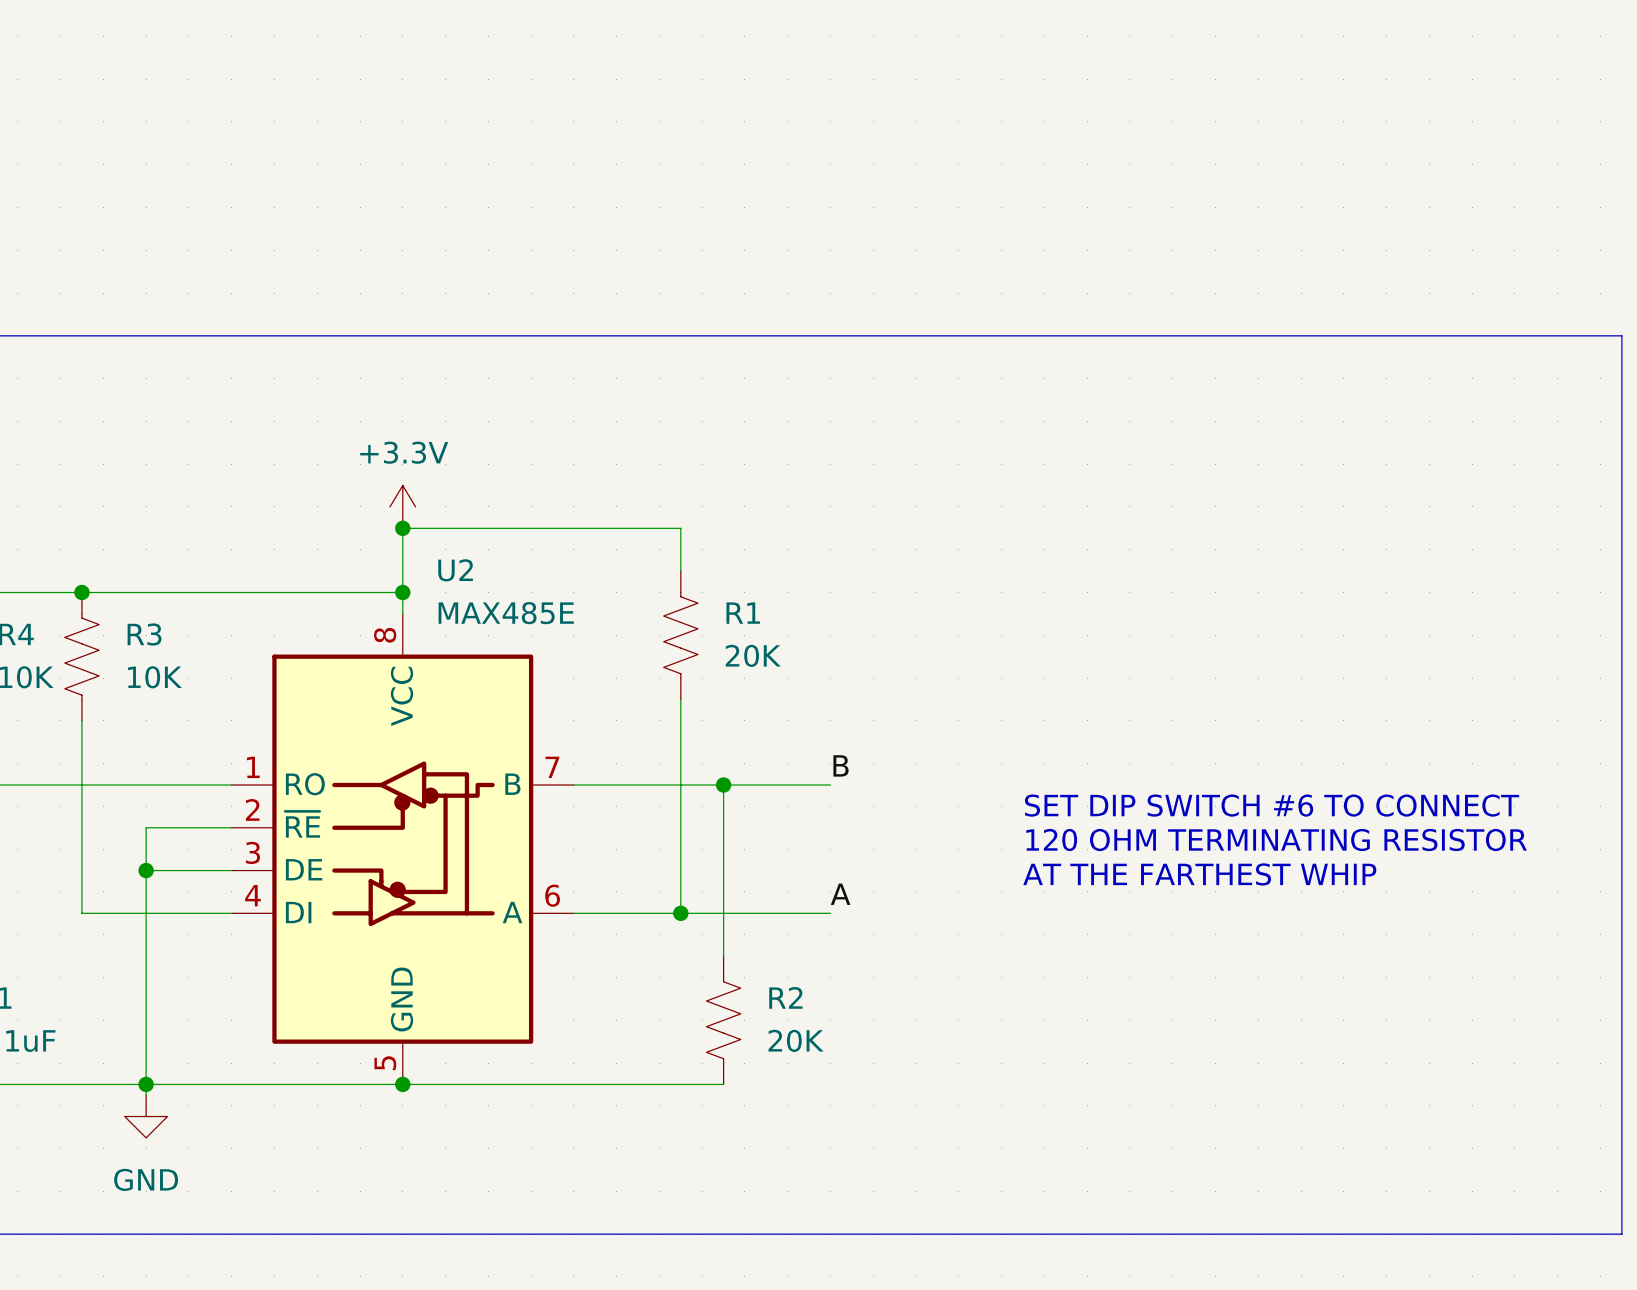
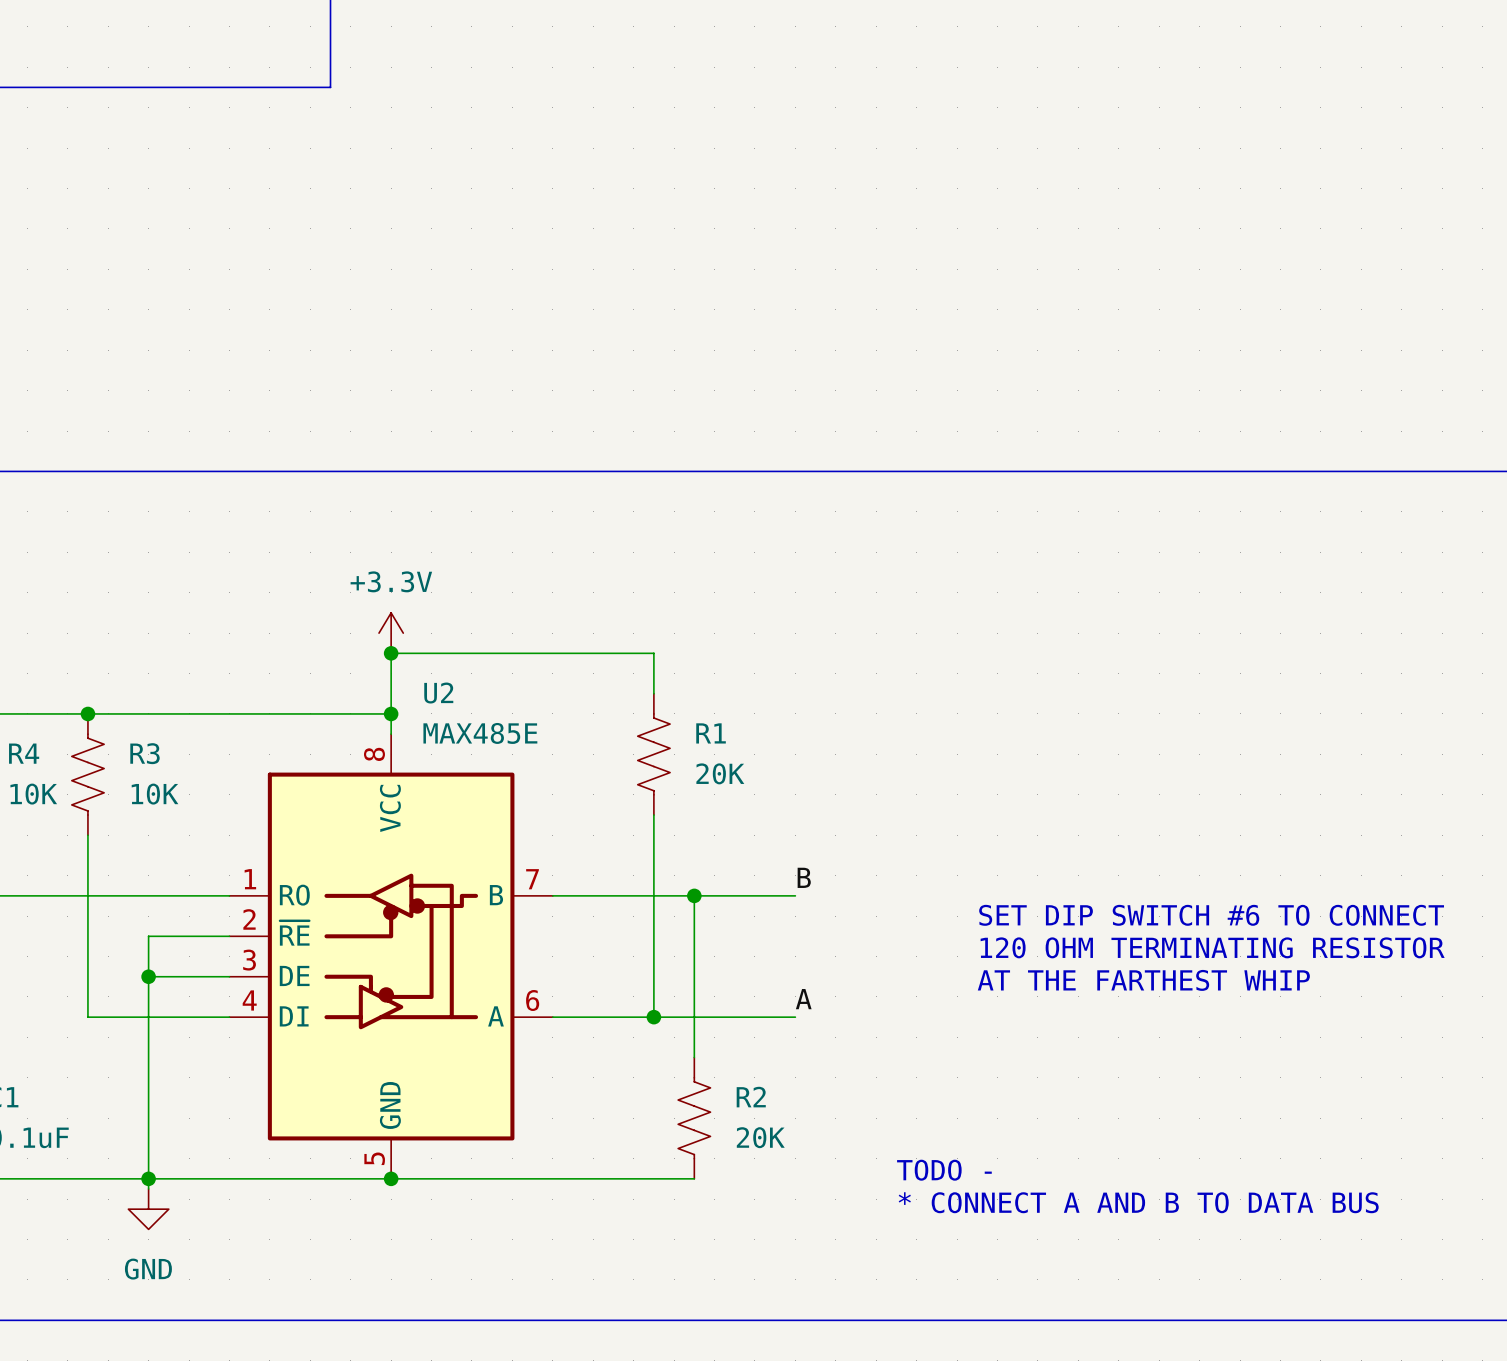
text: none -> TODO - (944, 1170)
text: none -> * CONNECT A AND B TO DATA BUS (1138, 1202)

